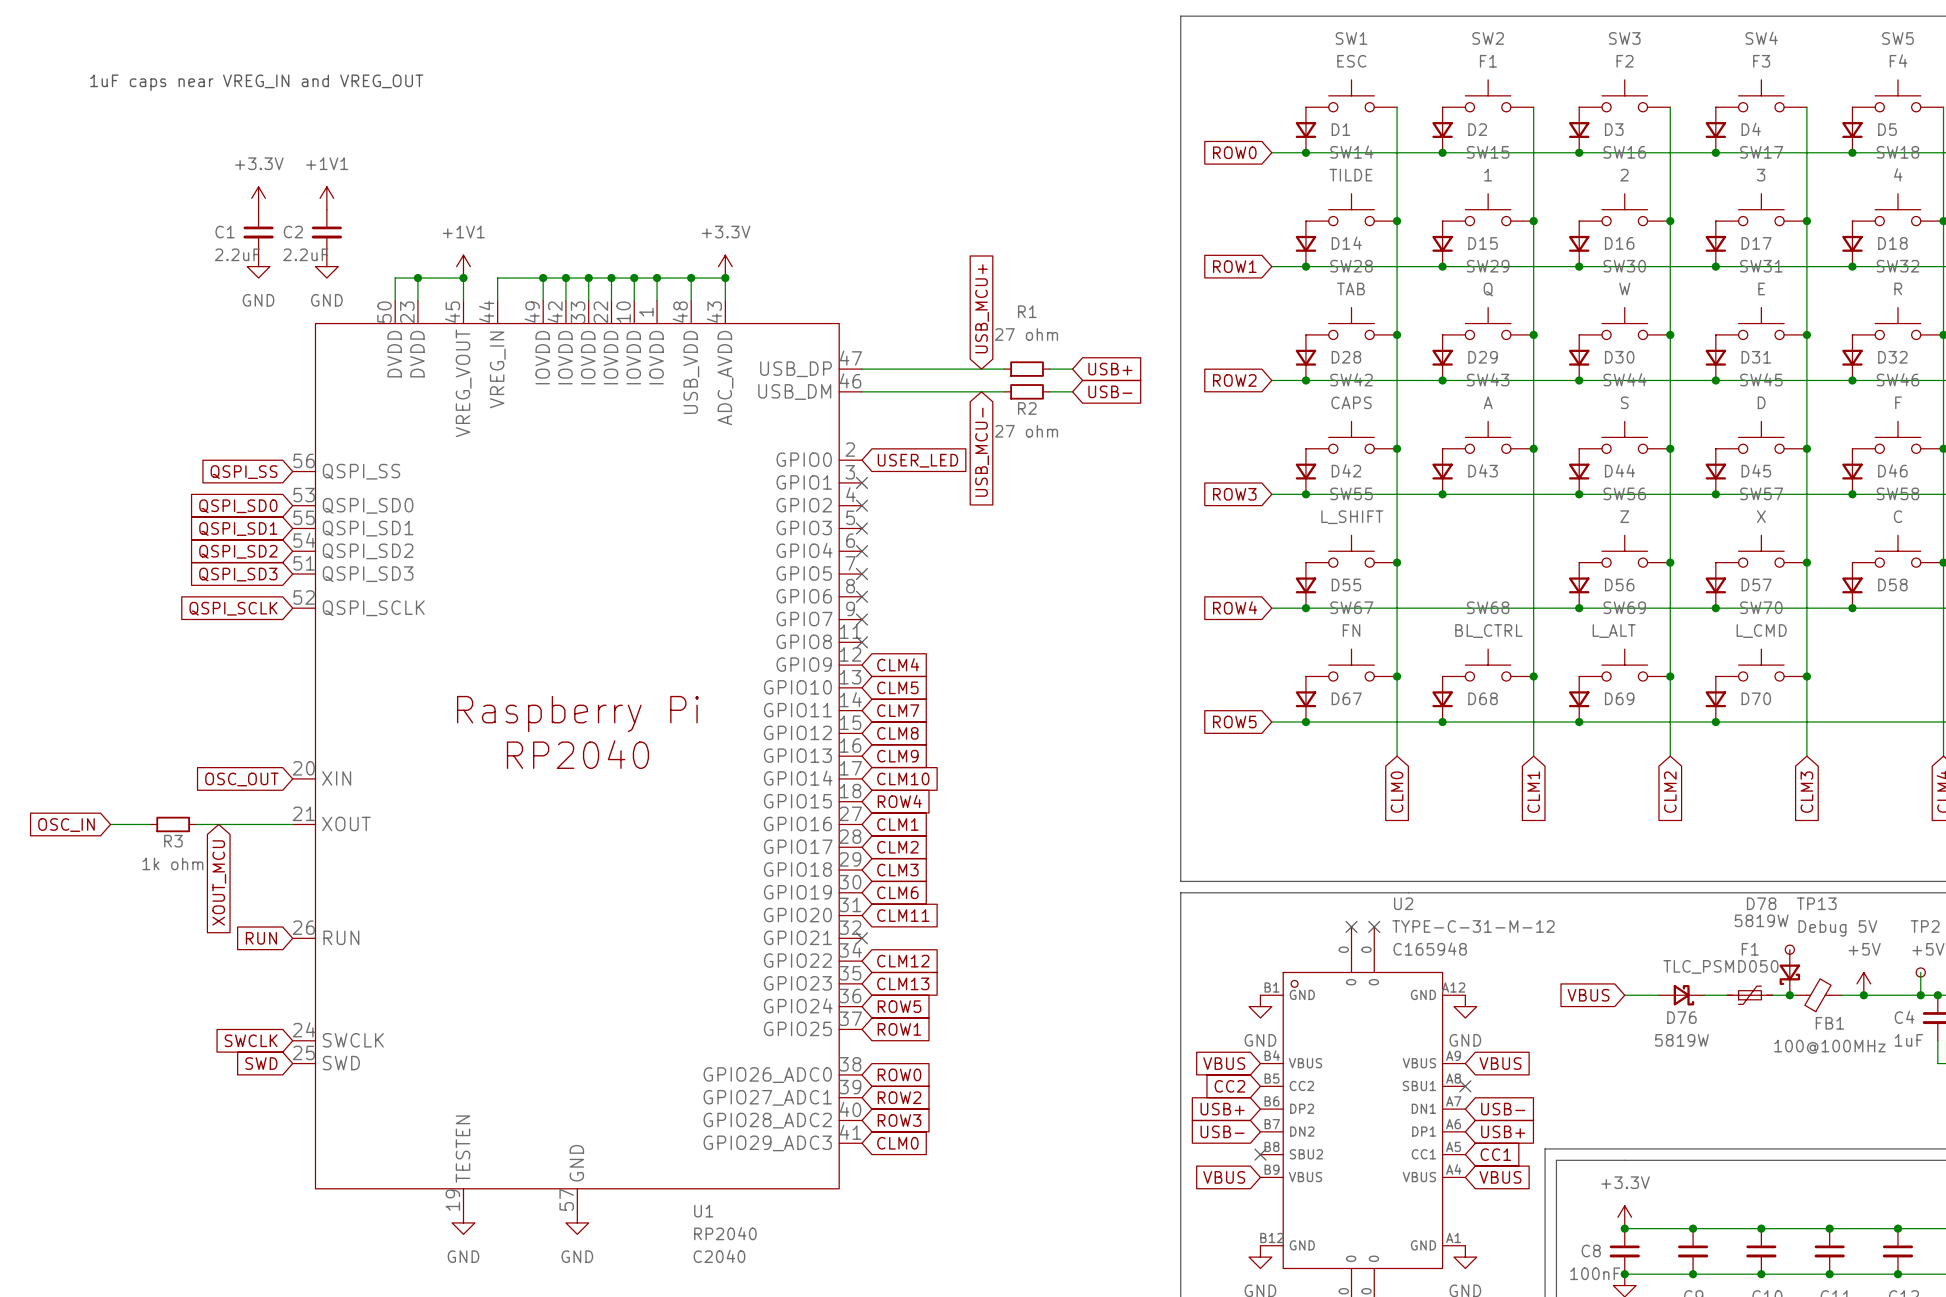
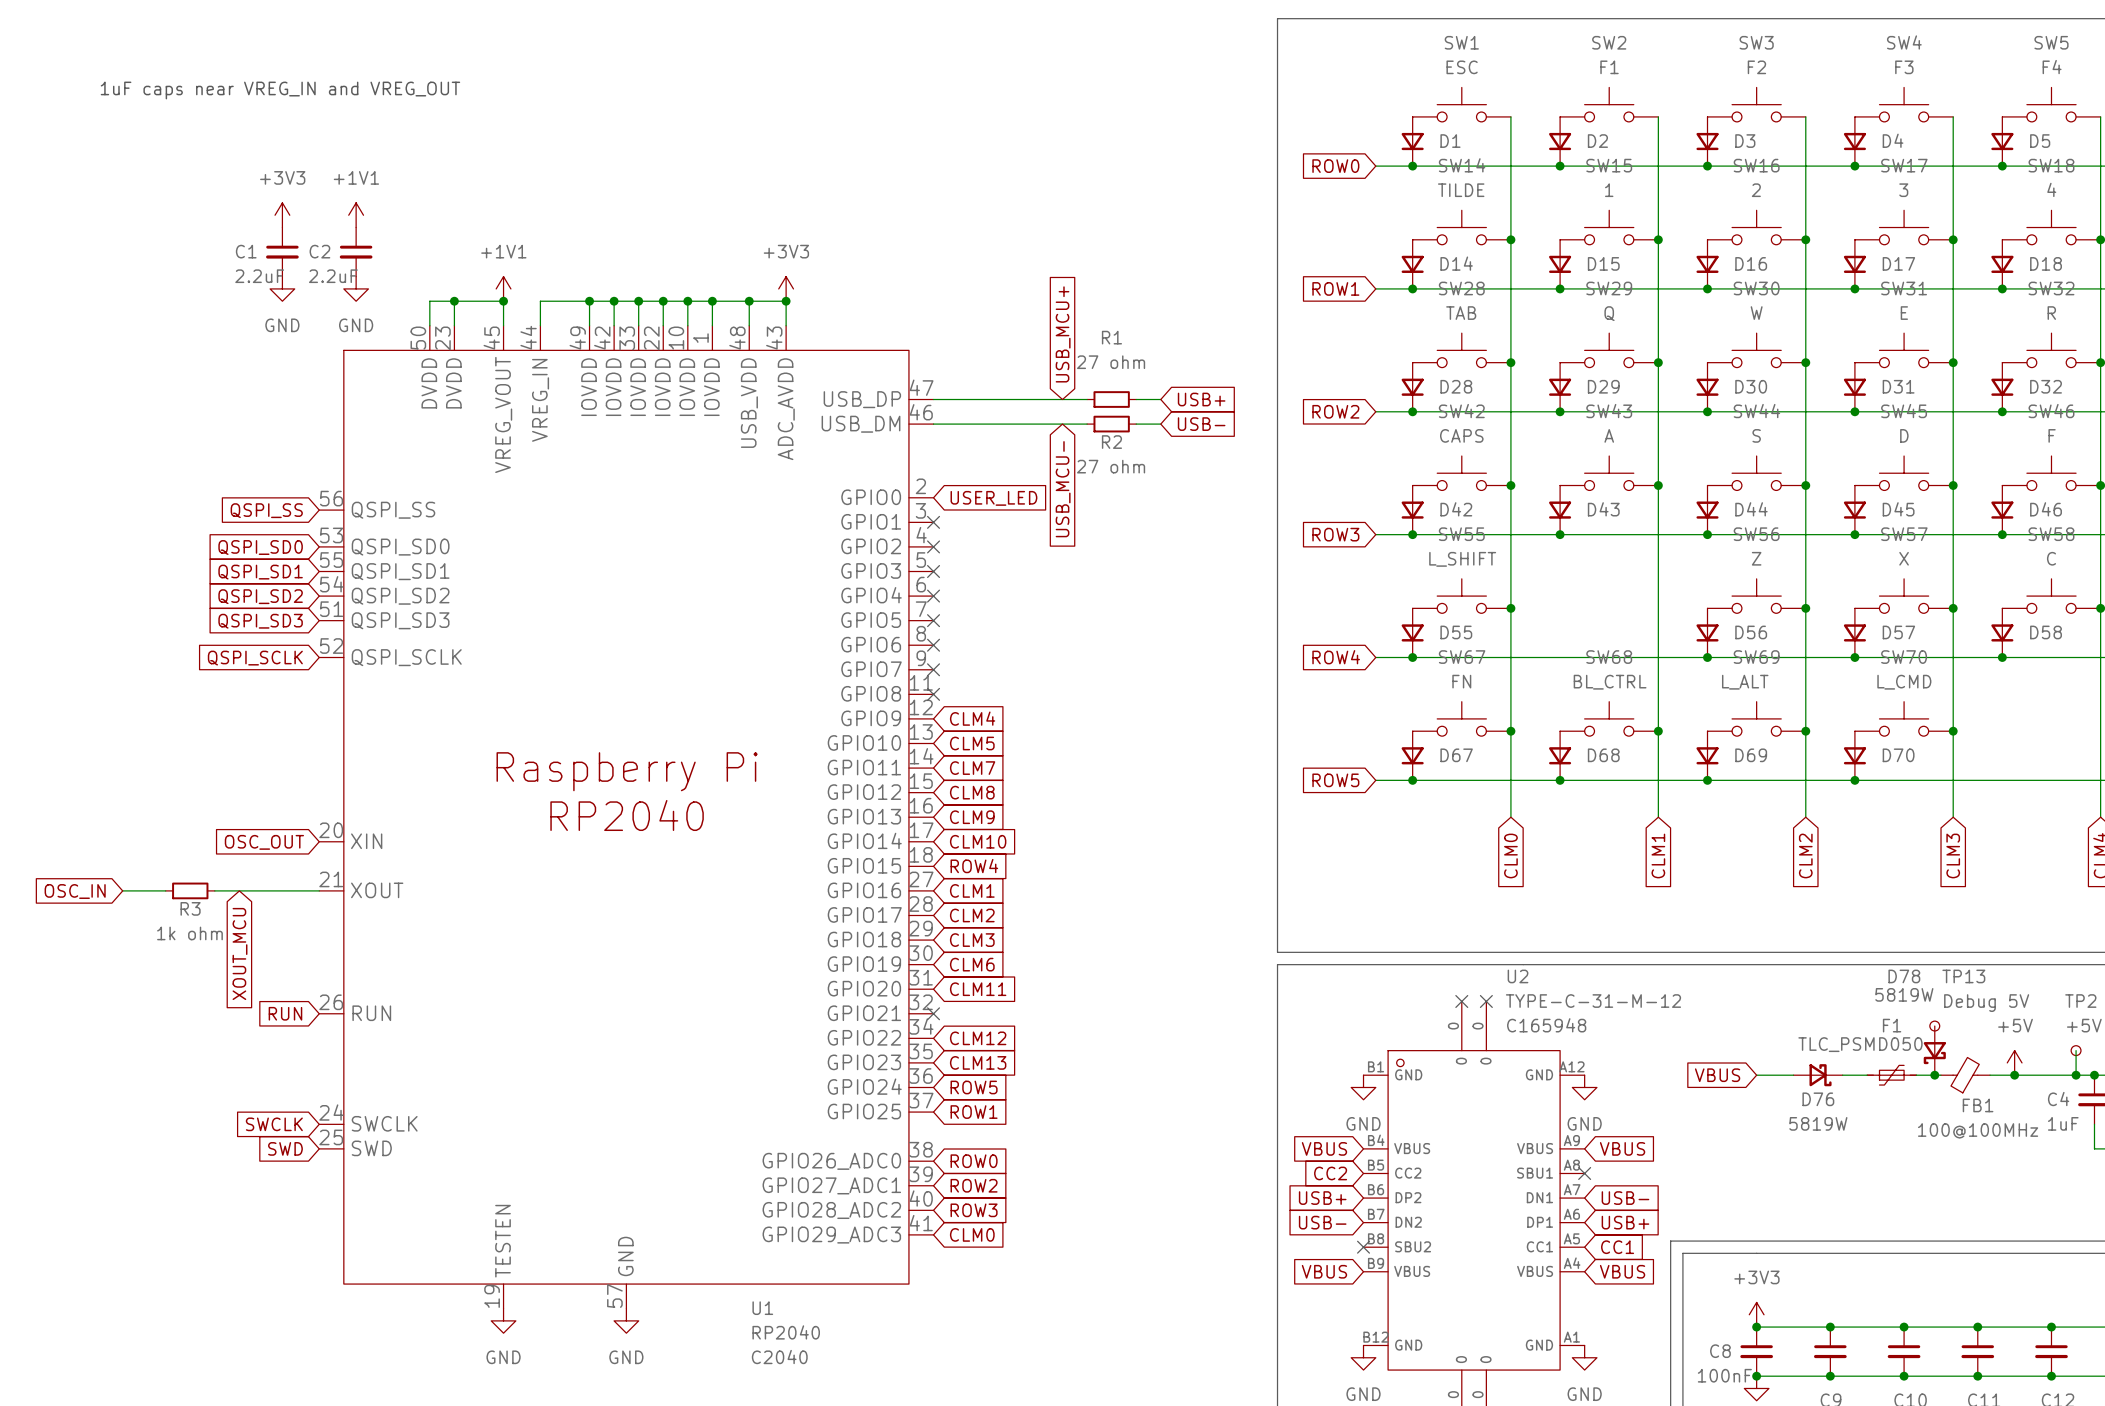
power symbol: +3.3V (258, 198) -> +3V3 (282, 215)
power symbol: +3.3V (725, 266) -> +3V3 (786, 288)
power symbol: +3.3V (1624, 1217) -> +3V3 (1756, 1314)

